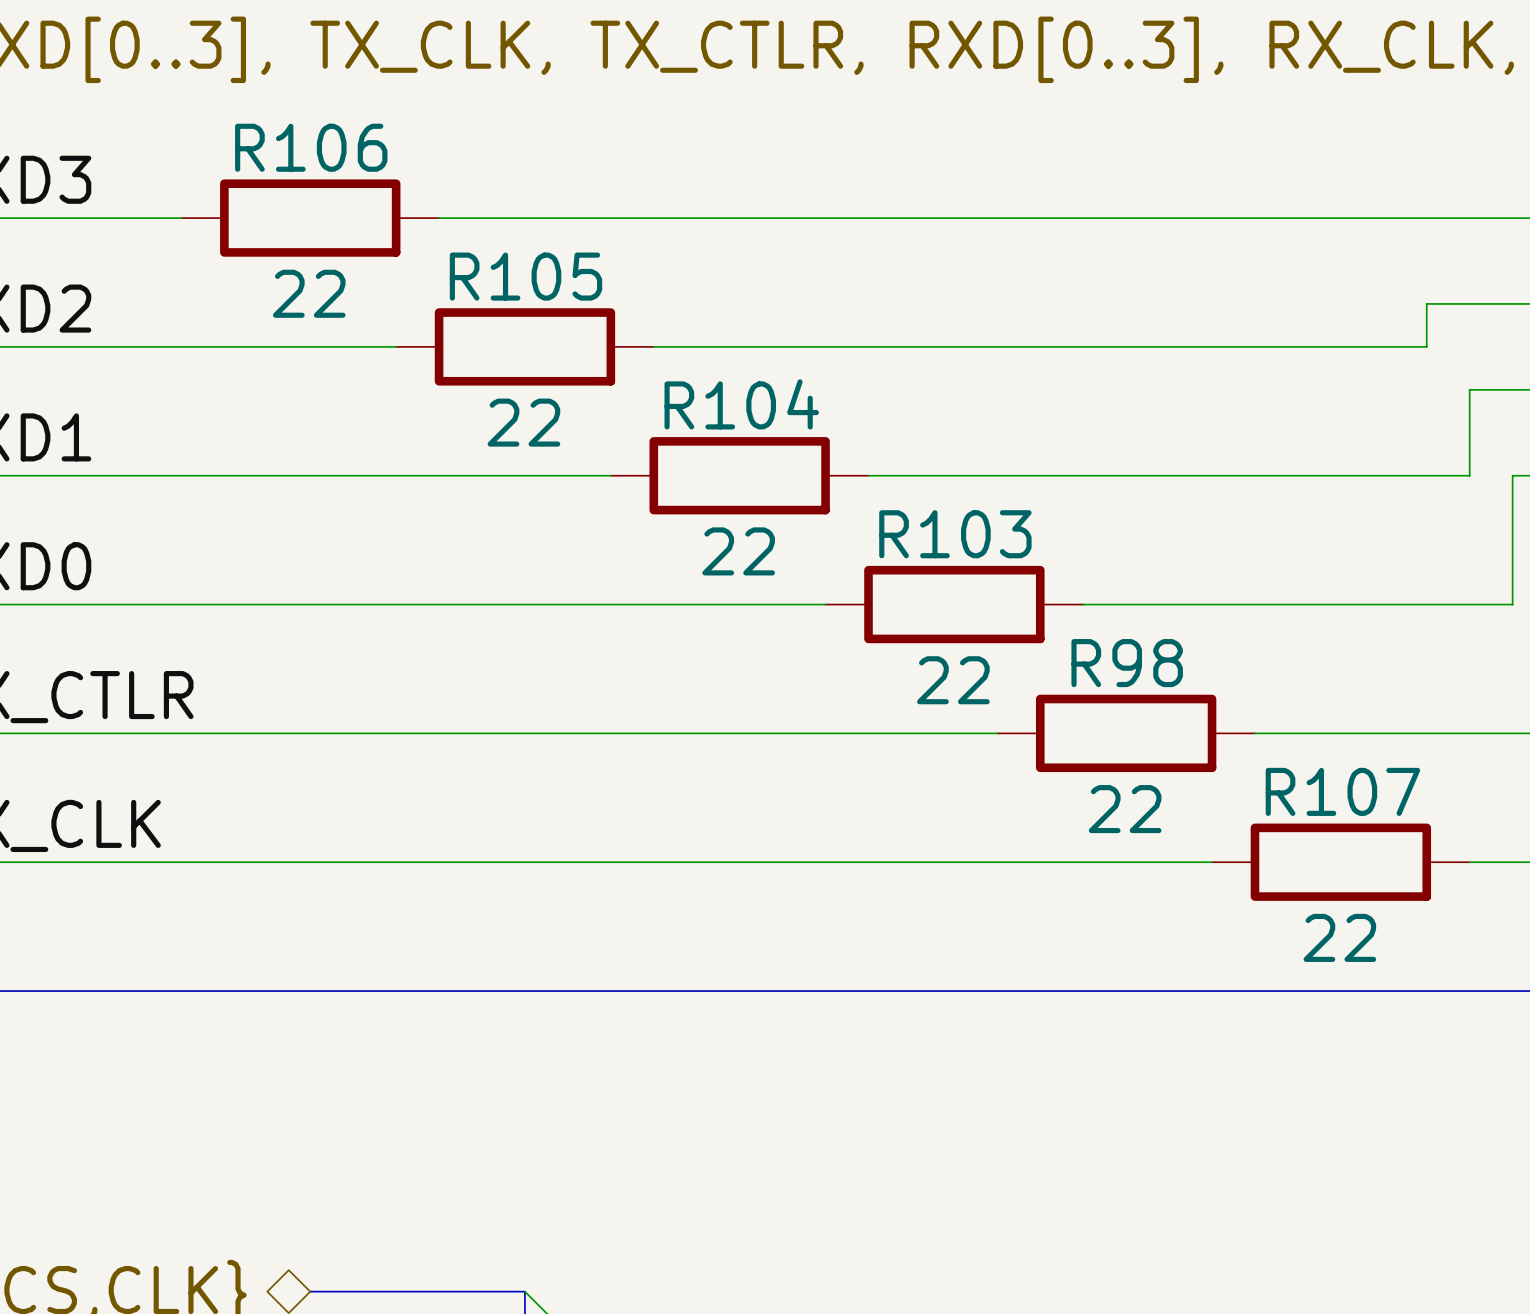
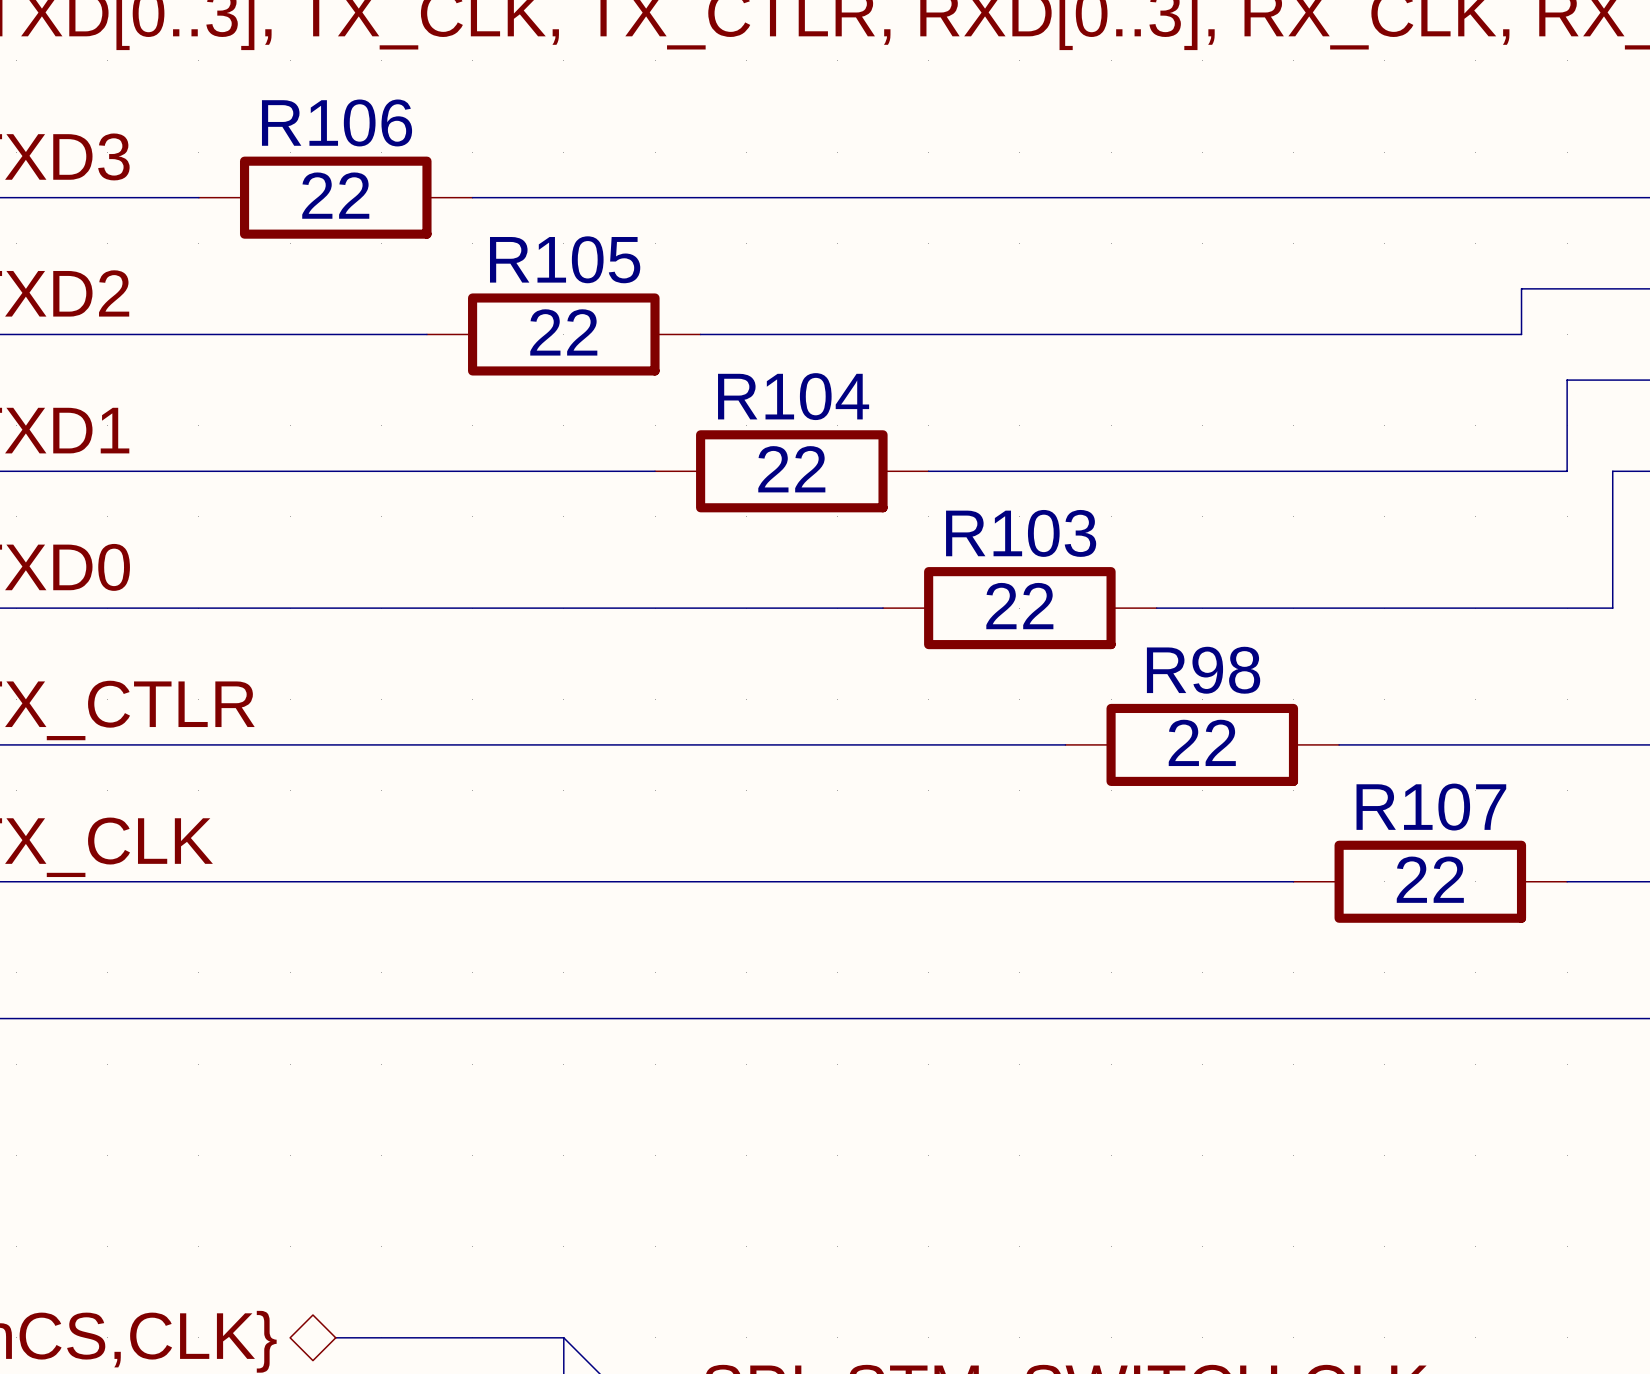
R106 value position: 22 (309, 293) -> 22 (335, 195)
R105 value position: 22 (523, 422) -> 22 (563, 332)
R104 value position: 22 (738, 551) -> 22 (791, 469)
R103 value position: 22 (953, 680) -> 22 (1019, 606)
R98 value position: 22 (1125, 809) -> 22 (1202, 742)
R107 value position: 22 (1339, 937) -> 22 (1430, 879)

